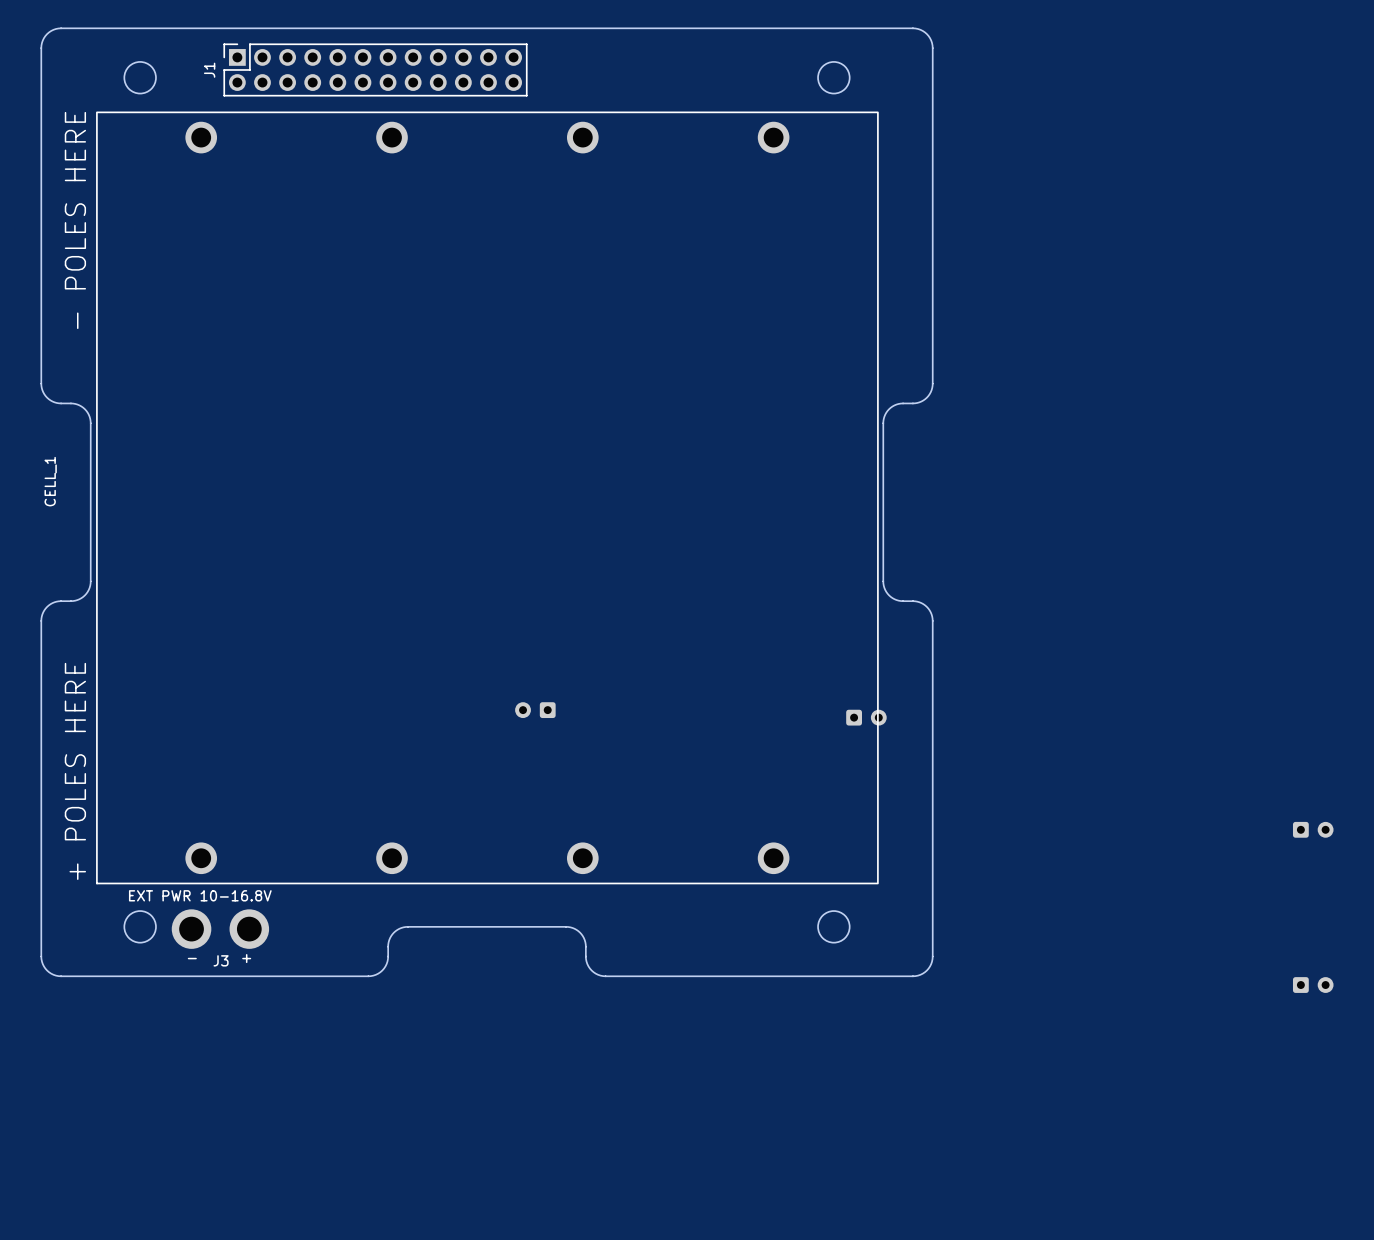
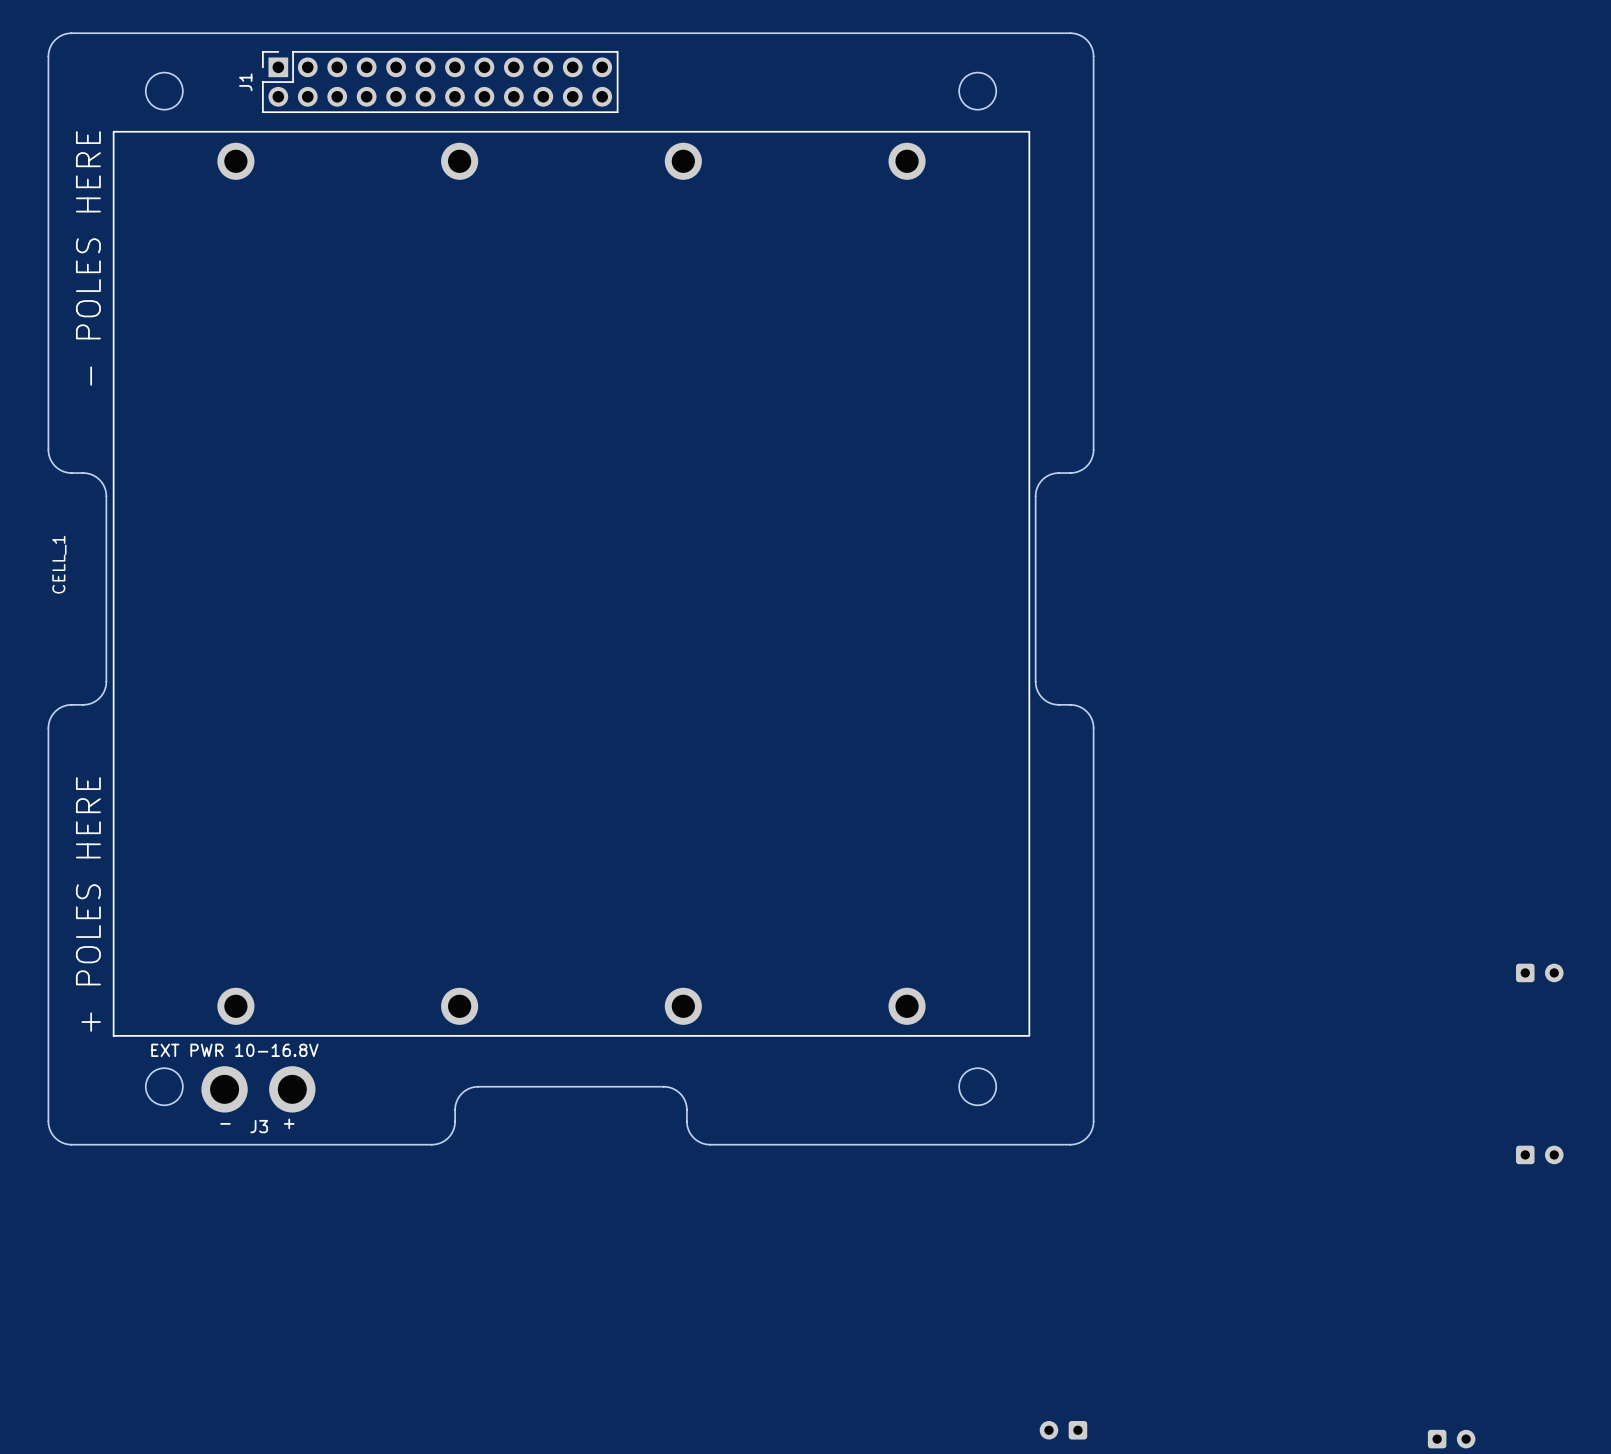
part: (535, 710) -> none
part: (866, 717) -> none
part: none -> (1063, 1430)
part: none -> (1451, 1439)

